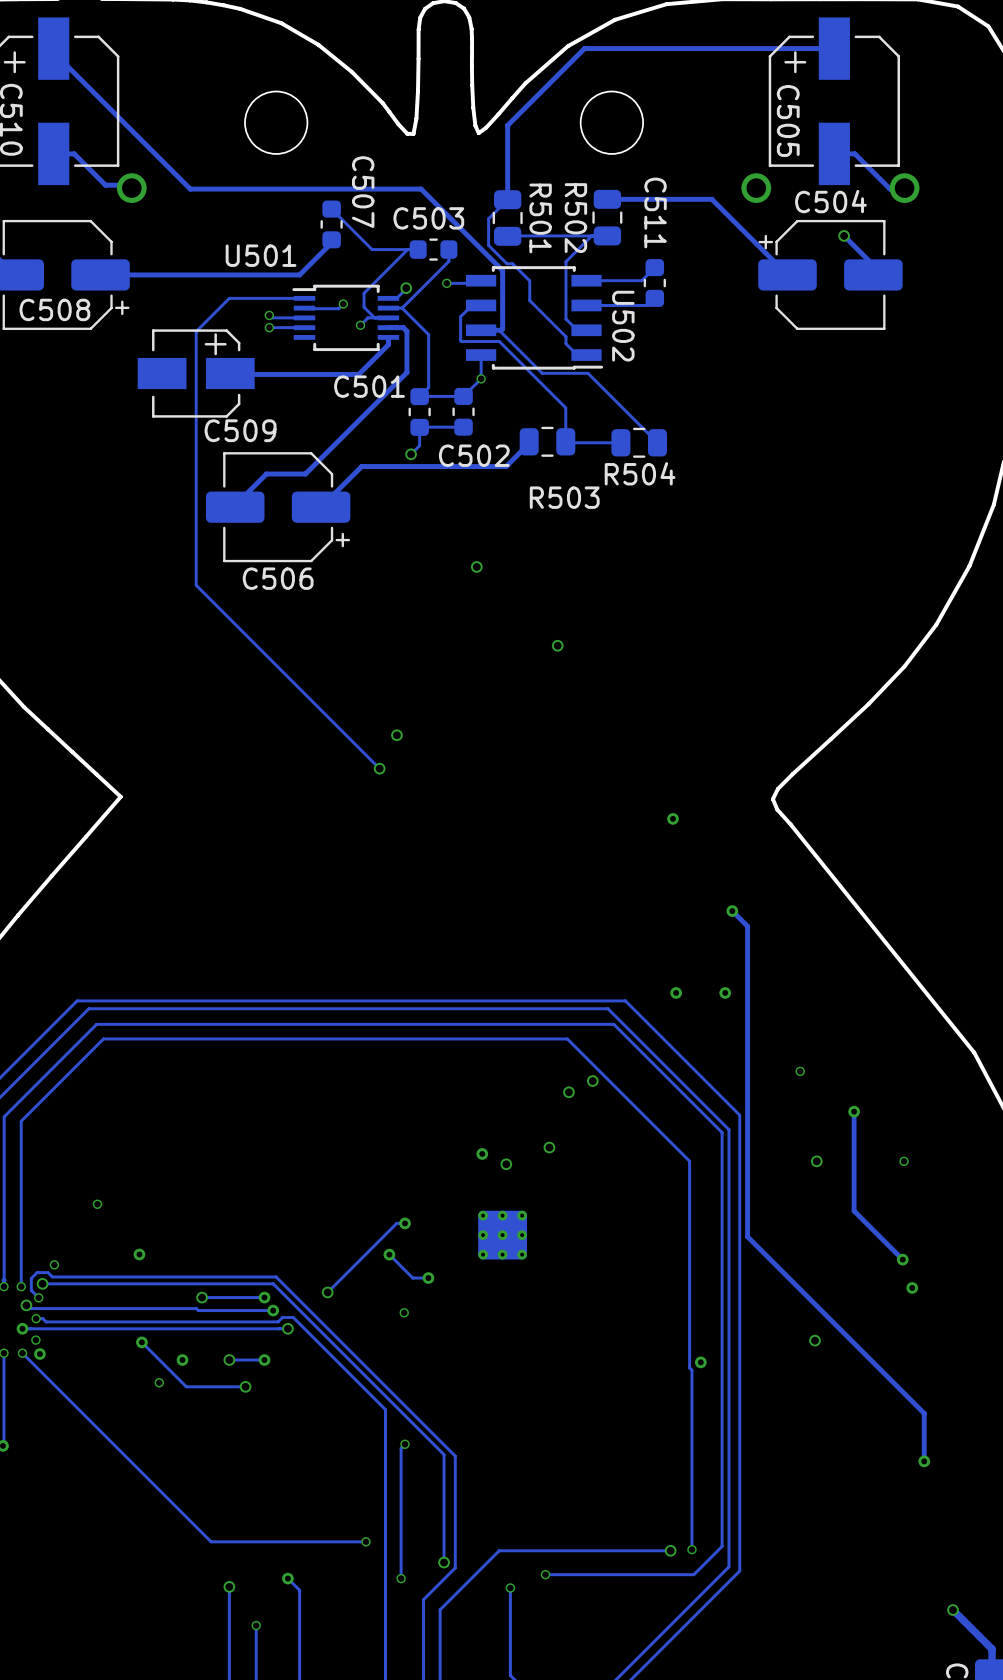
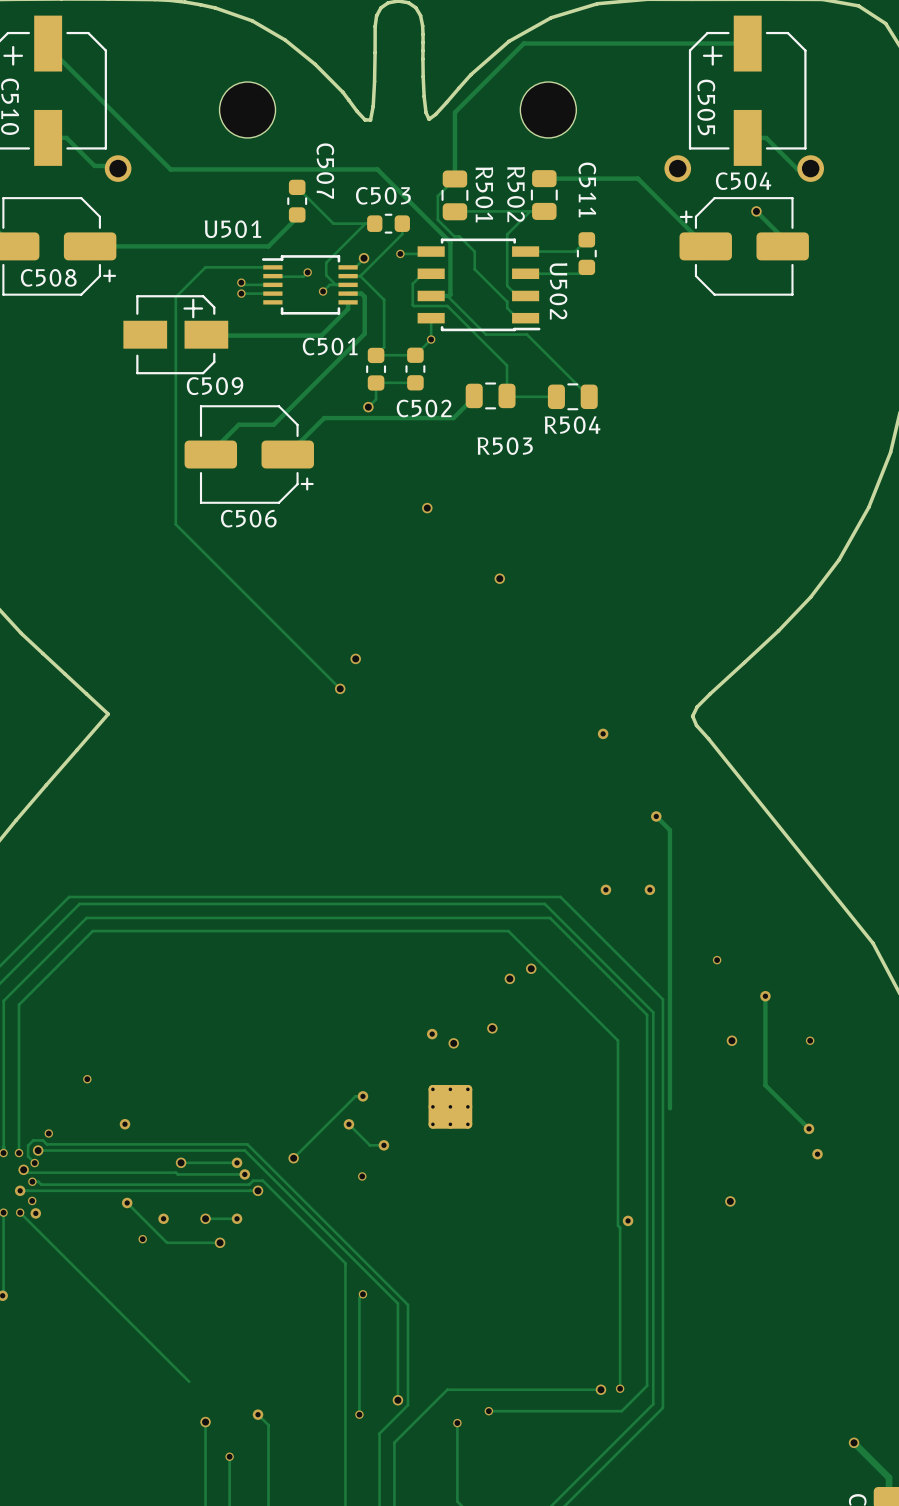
track: (747, 1236) (924, 1413) (924, 1461) -> none
via: (924, 1461) -> none
track: (365, 1541) (211, 1541) -> none
via: (365, 1541) -> none

